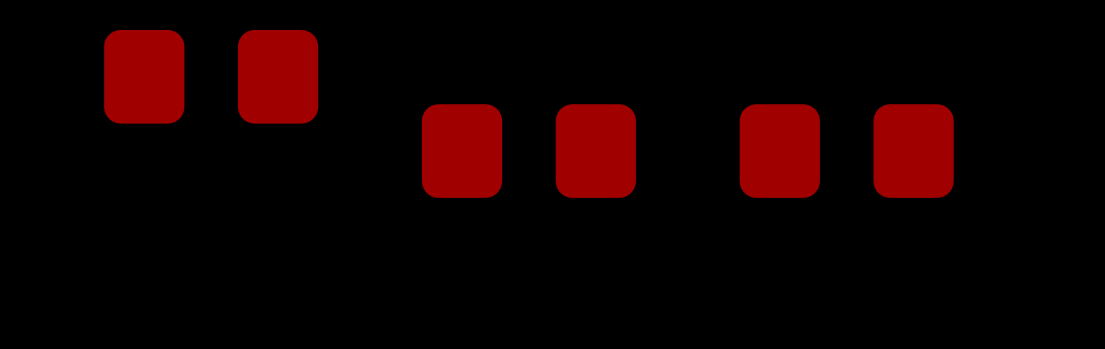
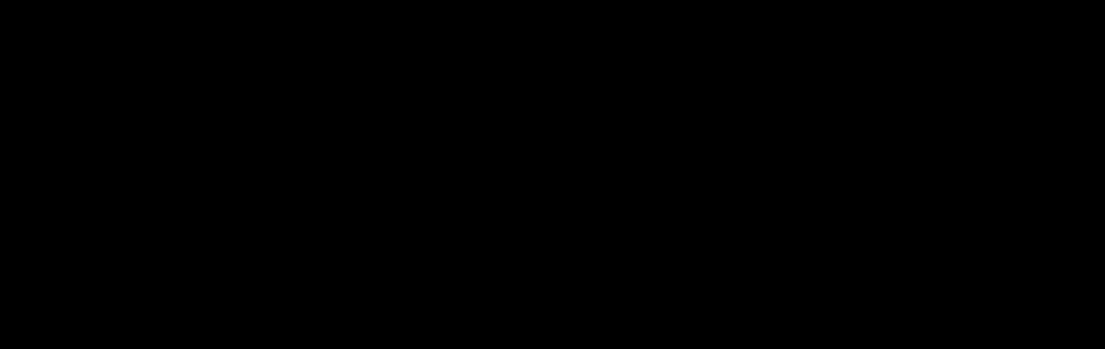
part: (211, 76) -> none
part: (528, 151) -> none
part: (846, 151) -> none

